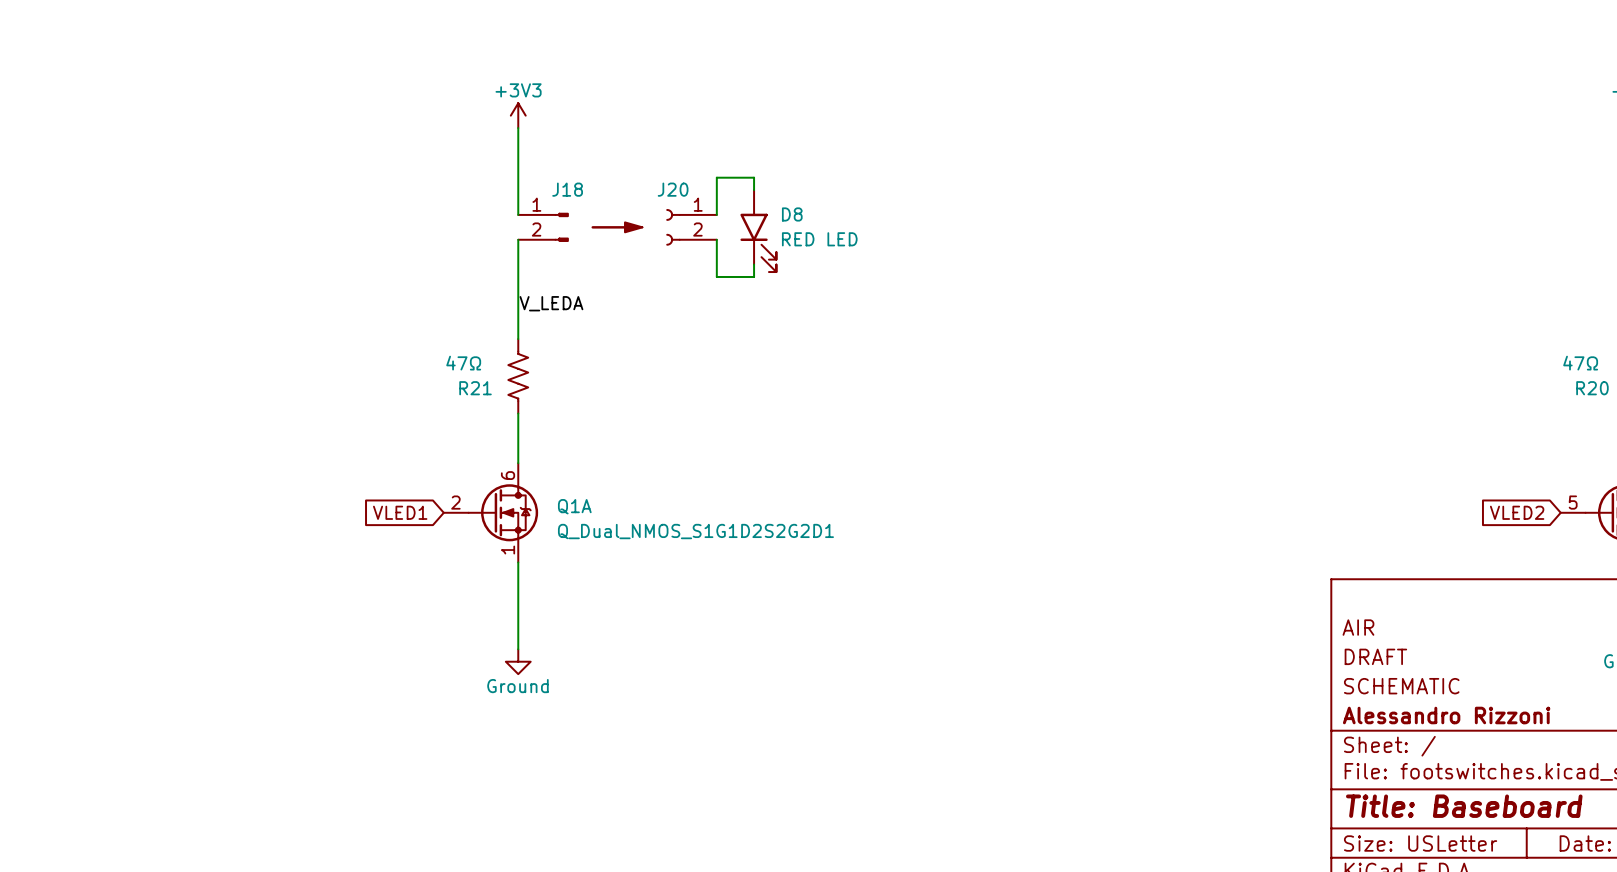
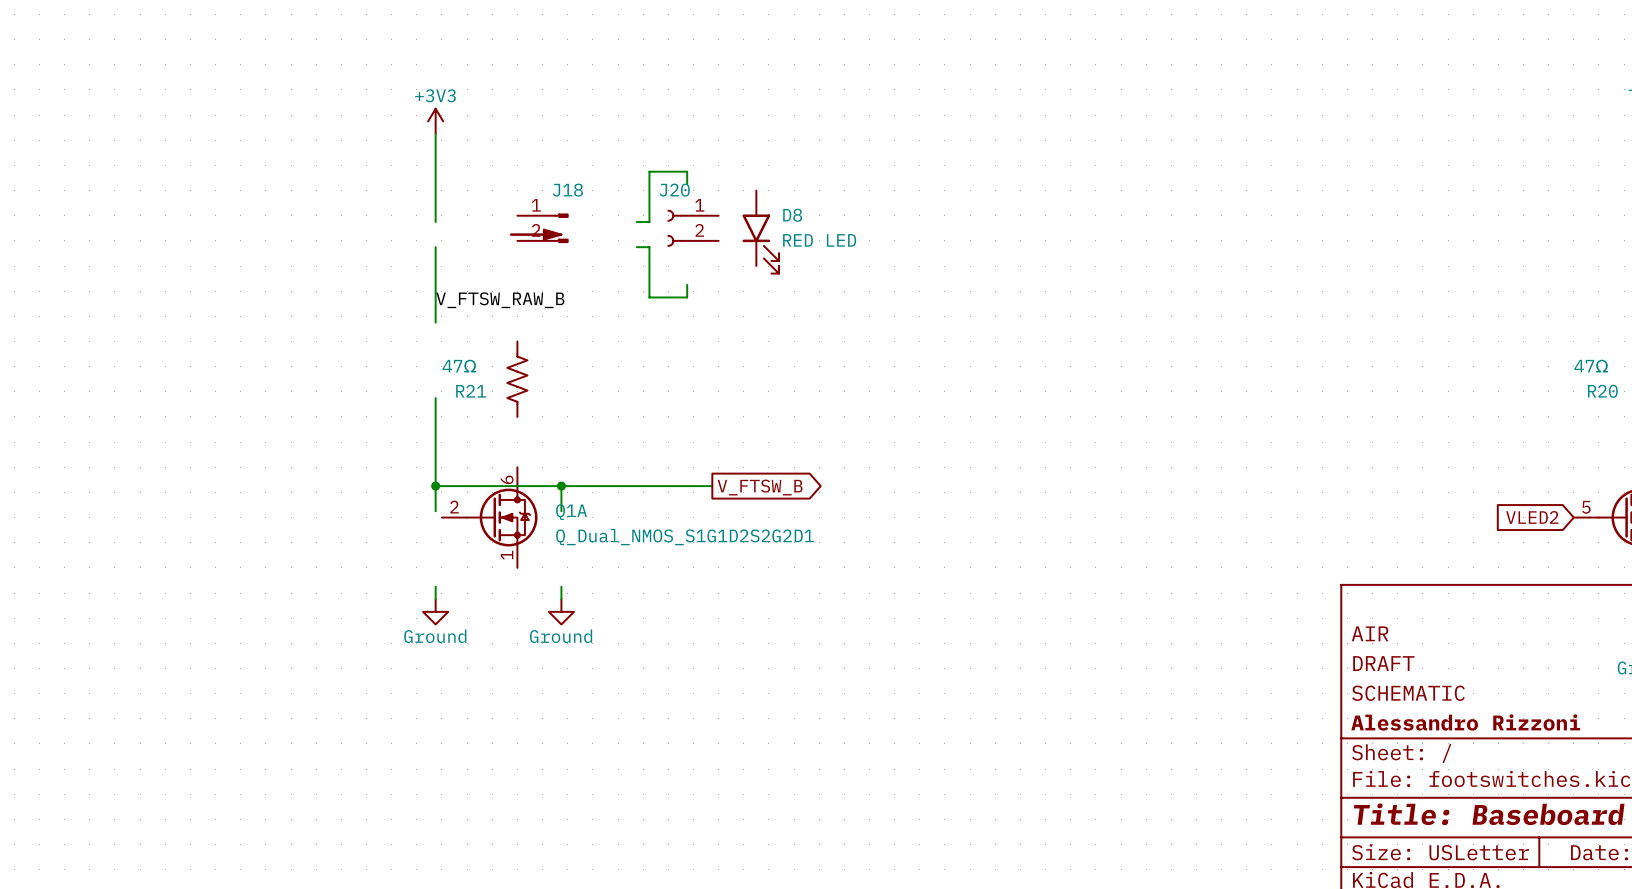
power symbol position: +3V3 (518, 115) -> +3V3 (435, 121)
wire: (518, 128) (518, 214) -> (435, 133) (435, 222)
wire: none -> (687, 184) (687, 171) (649, 171) (649, 222) (636, 222)
wire: (754, 190) (754, 177) (716, 177) (716, 214) -> none
power symbol position: (616, 227) -> (535, 234)
wire: (518, 239) (518, 339) -> none
wire: (716, 239) (716, 276) (754, 276) (754, 264) -> none
wire: none -> (435, 247) (435, 322)
wire: none -> (636, 247) (649, 247) (649, 297) (687, 297) (687, 284)
label: none -> V_FTSW_RAW_B (500, 300)
label: V_LEDA (551, 303) -> none
wire: none -> (435, 398) (435, 511)
wire: (518, 413) (518, 463) -> none
wire: none -> (435, 486) (712, 486)
junction: none -> (435, 486)
wire: none -> (561, 486) (561, 511)
junction: none -> (561, 486)
global label: none -> V_FTSW_B (760, 487)
global label: VLED1 (400, 512) -> none
wire: (518, 562) (518, 649) -> none
wire: none -> (435, 586) (435, 599)
wire: none -> (561, 586) (561, 599)
power symbol: none -> Ground (435, 611)
power symbol: none -> Ground (561, 611)
power symbol: Ground (518, 661) -> none

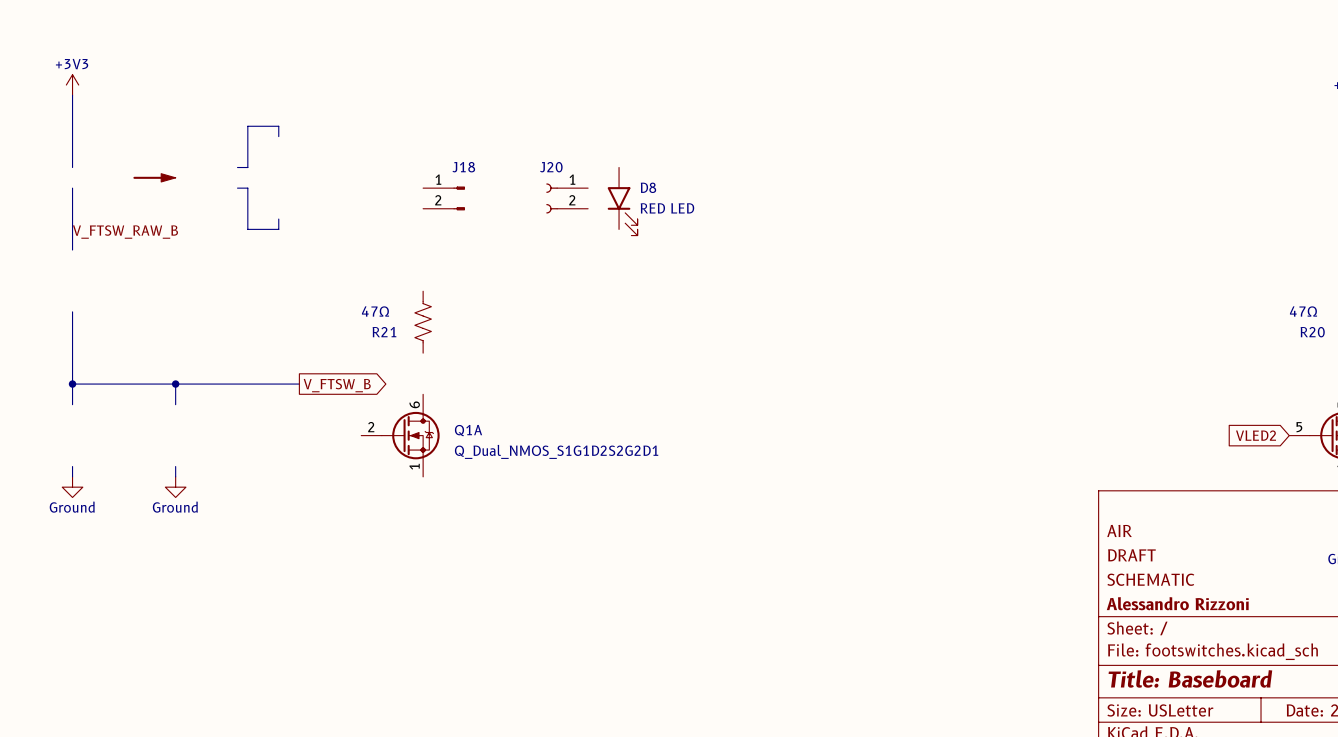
power symbol: none -> +3V3 (72, 85)
wire: none -> (72, 95) (72, 167)
power symbol: +3V3 (435, 121) -> none
wire: (435, 133) (435, 222) -> none
wire: none -> (278, 136) (278, 126) (247, 126) (247, 167) (237, 167)
wire: (687, 184) (687, 171) (649, 171) (649, 222) (636, 222) -> none
power symbol: none -> (154, 177)
wire: none -> (72, 188) (72, 250)
wire: none -> (237, 188) (247, 188) (247, 229) (278, 229) (278, 219)
power symbol: (535, 234) -> none
wire: (435, 247) (435, 322) -> none
wire: (636, 247) (649, 247) (649, 297) (687, 297) (687, 284) -> none
label: none -> V_FTSW_RAW_B (125, 232)
label: V_FTSW_RAW_B (500, 300) -> none
wire: none -> (72, 311) (72, 404)
wire: (435, 398) (435, 511) -> none
wire: none -> (72, 384) (299, 384)
junction: none -> (72, 384)
wire: none -> (175, 384) (175, 404)
junction: none -> (175, 384)
global label: none -> V_FTSW_B (337, 385)
wire: (435, 486) (712, 486) -> none
junction: (435, 486) -> none
wire: (561, 486) (561, 511) -> none
junction: (561, 486) -> none
global label: V_FTSW_B (760, 487) -> none
wire: none -> (72, 466) (72, 476)
power symbol: none -> Ground (72, 487)
power symbol: none -> Ground (175, 487)
wire: (435, 586) (435, 599) -> (175, 466) (175, 476)
wire: (561, 586) (561, 599) -> none
power symbol: Ground (435, 611) -> none
power symbol: Ground (561, 611) -> none

